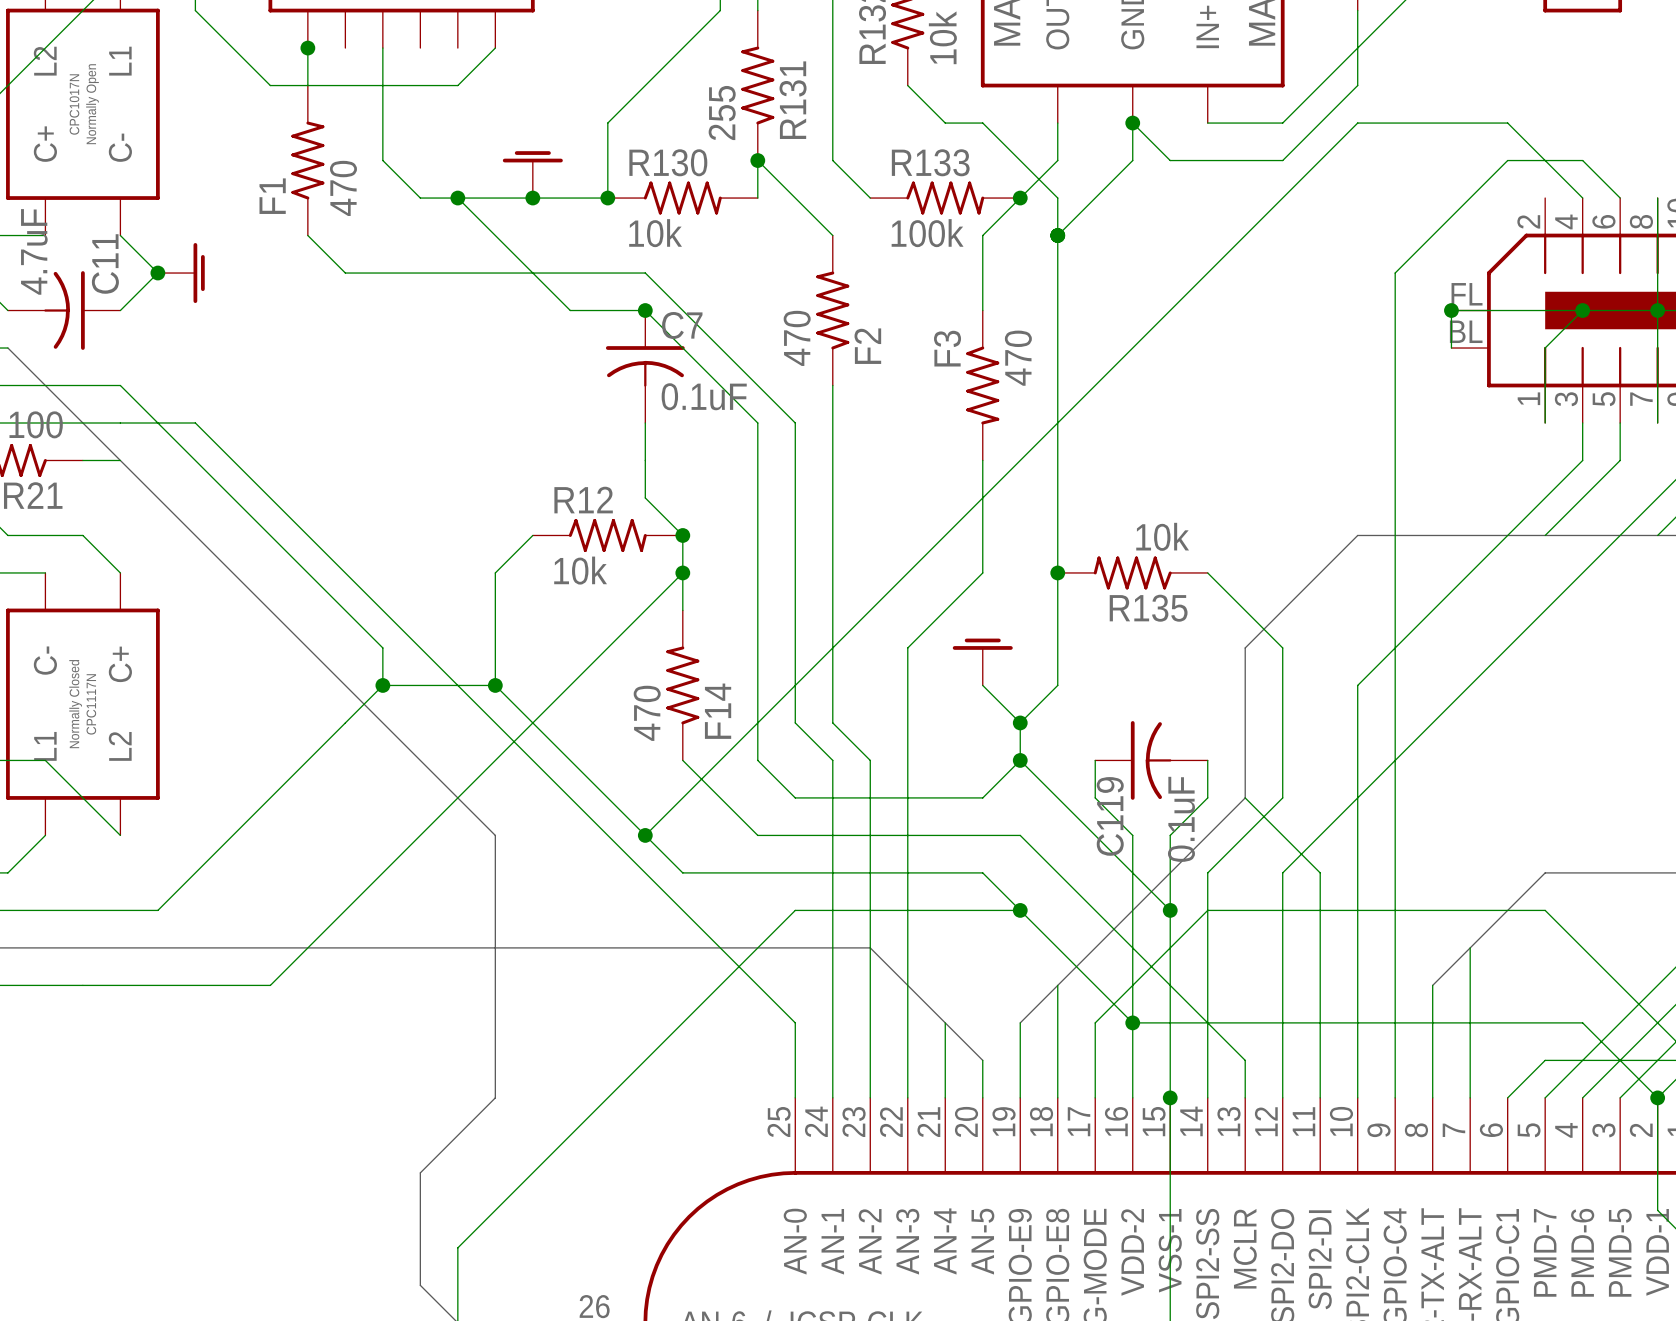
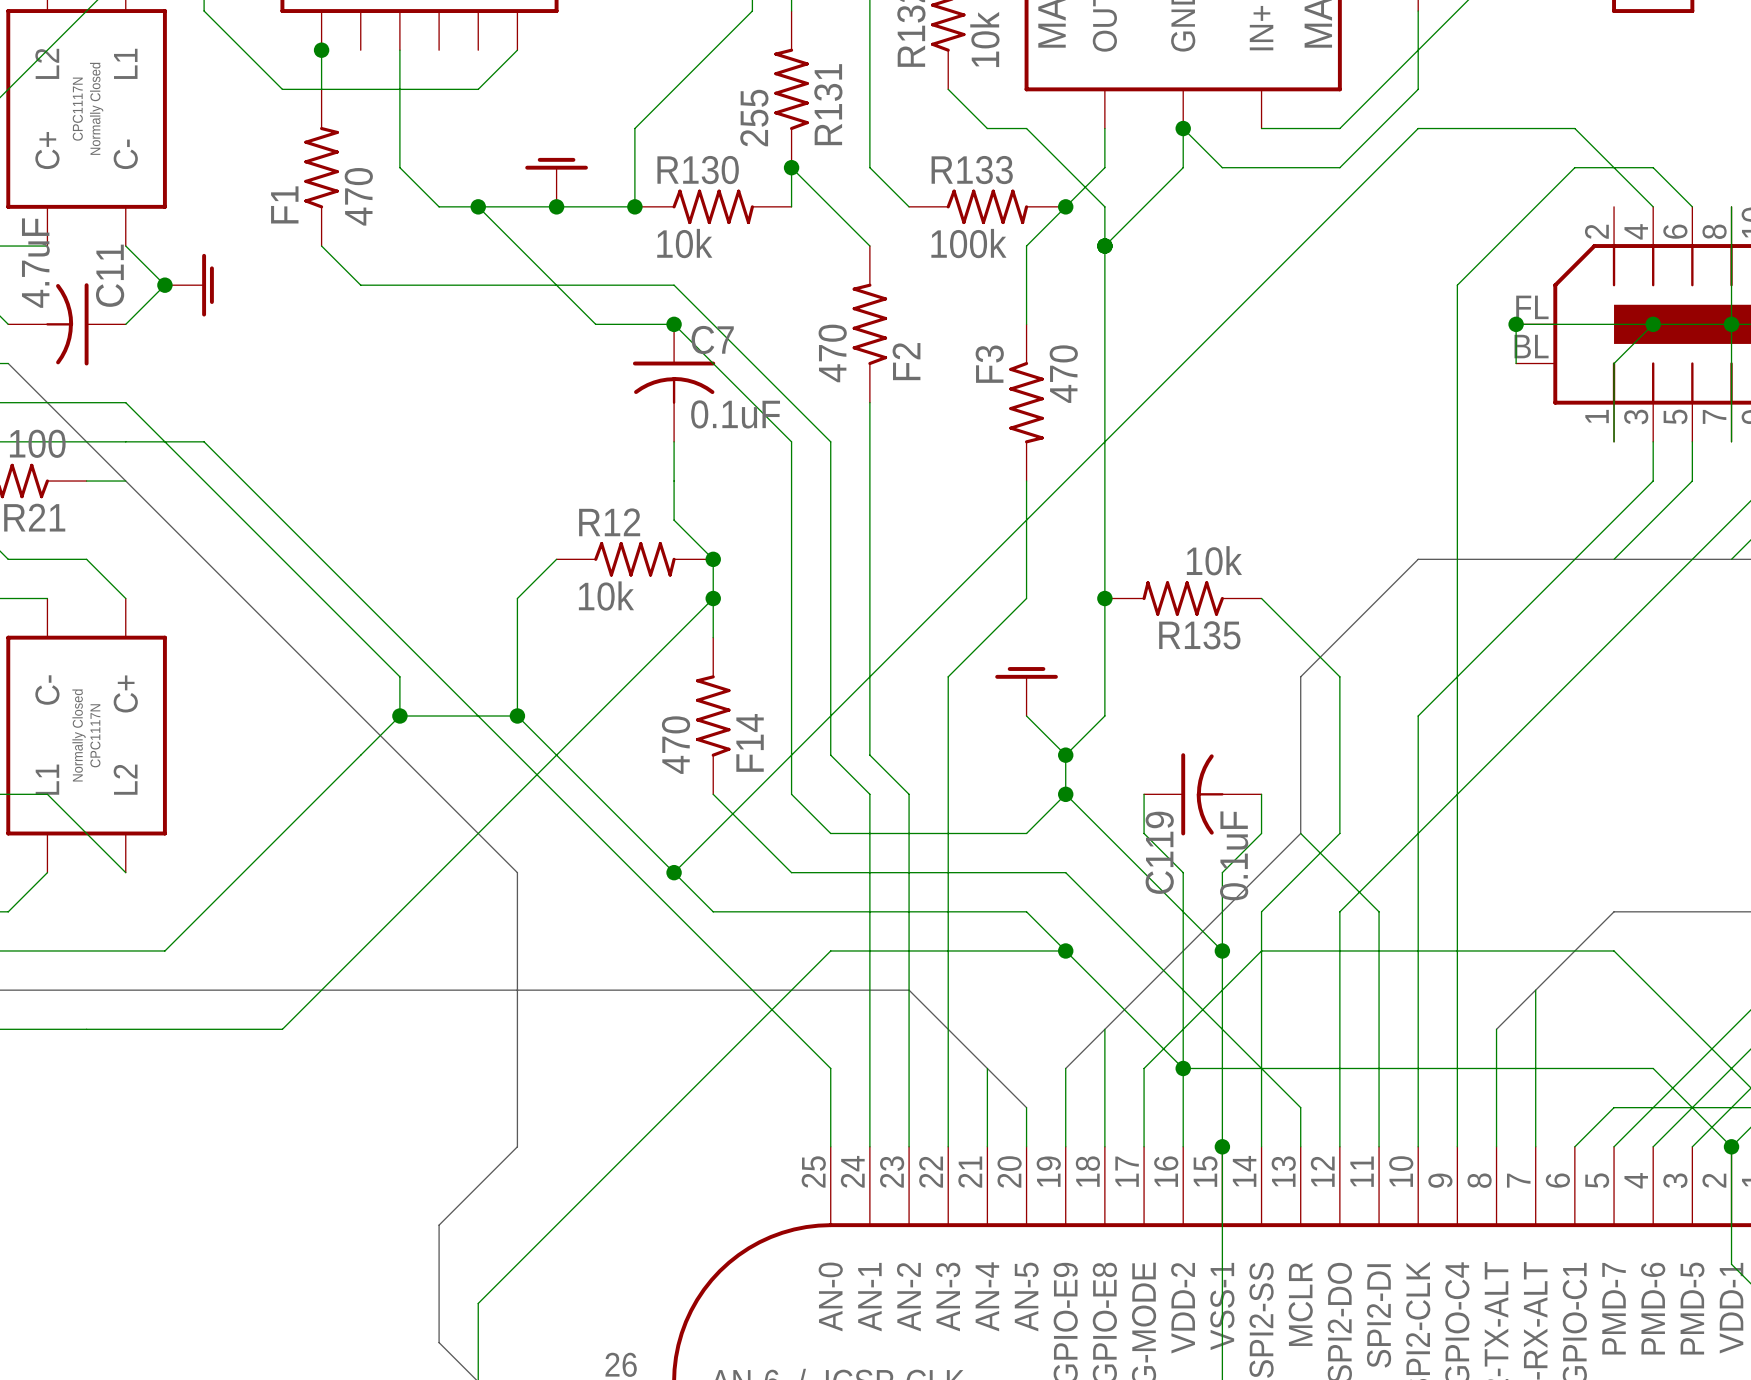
part text: CPC1017N (74, 104) -> CPC1117N (77, 109)
part text: Normally Open (92, 104) -> Normally Closed (96, 108)

